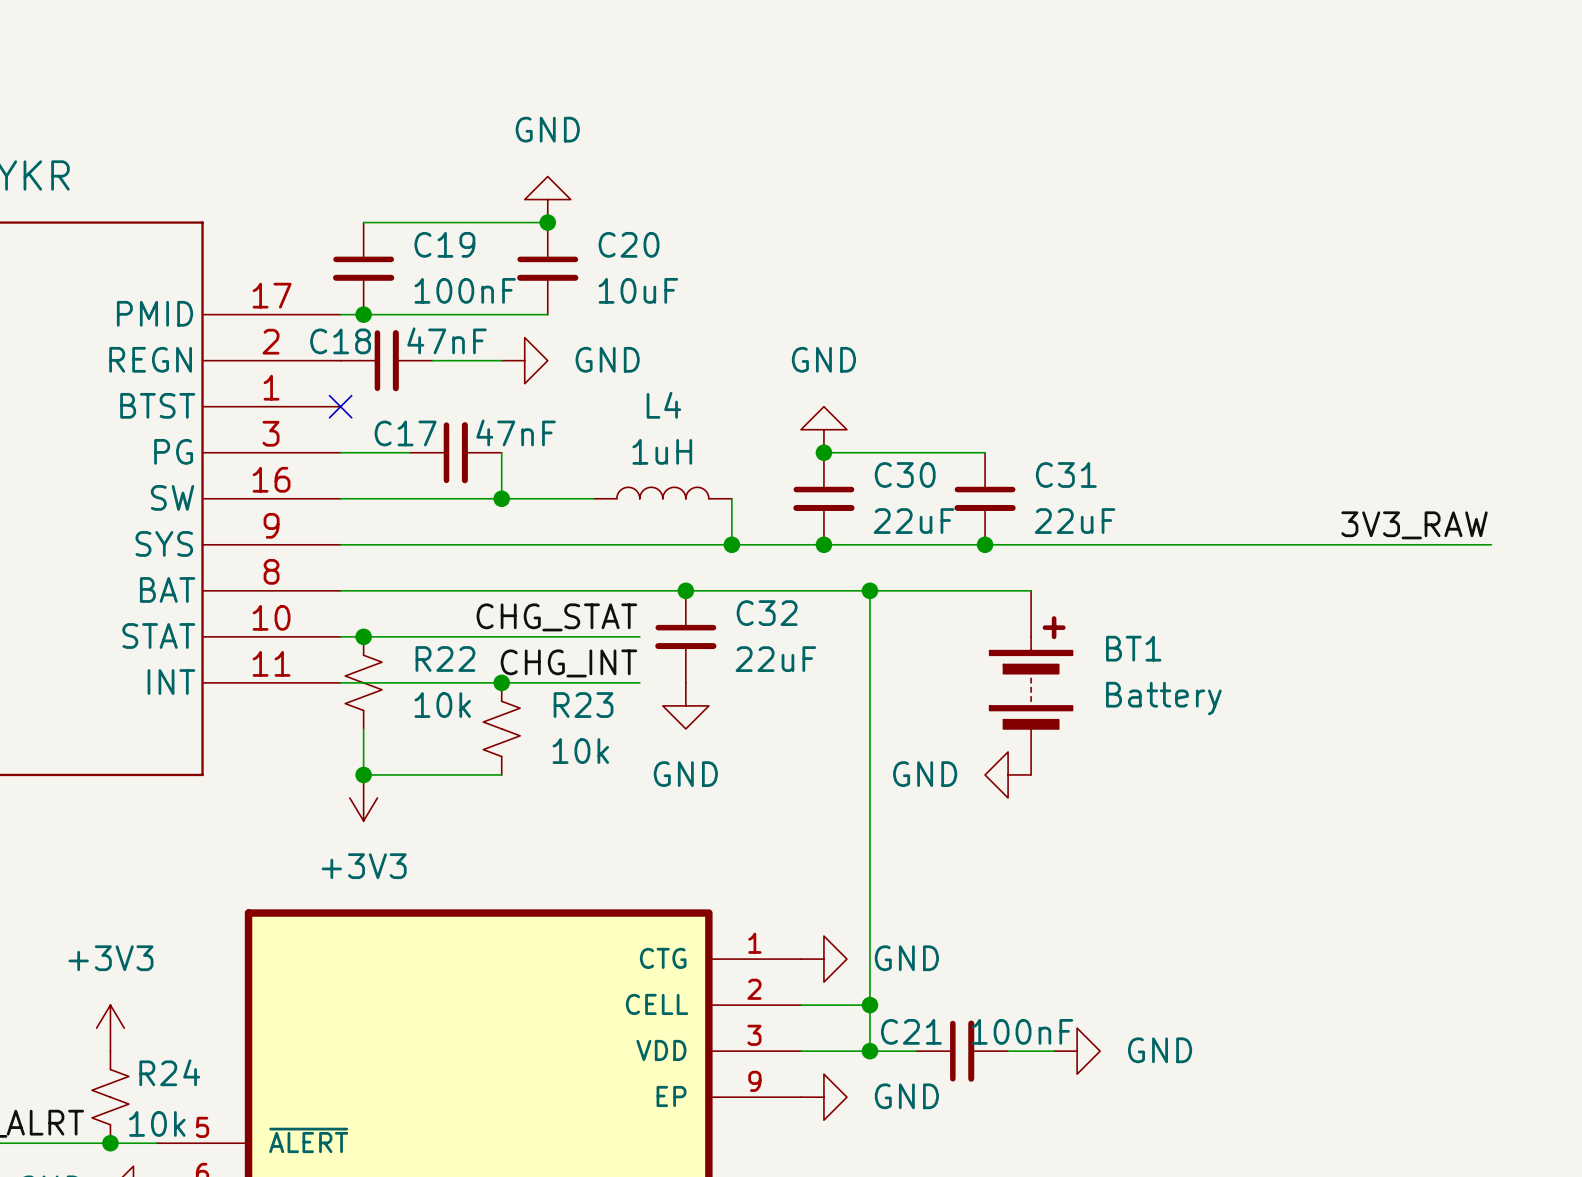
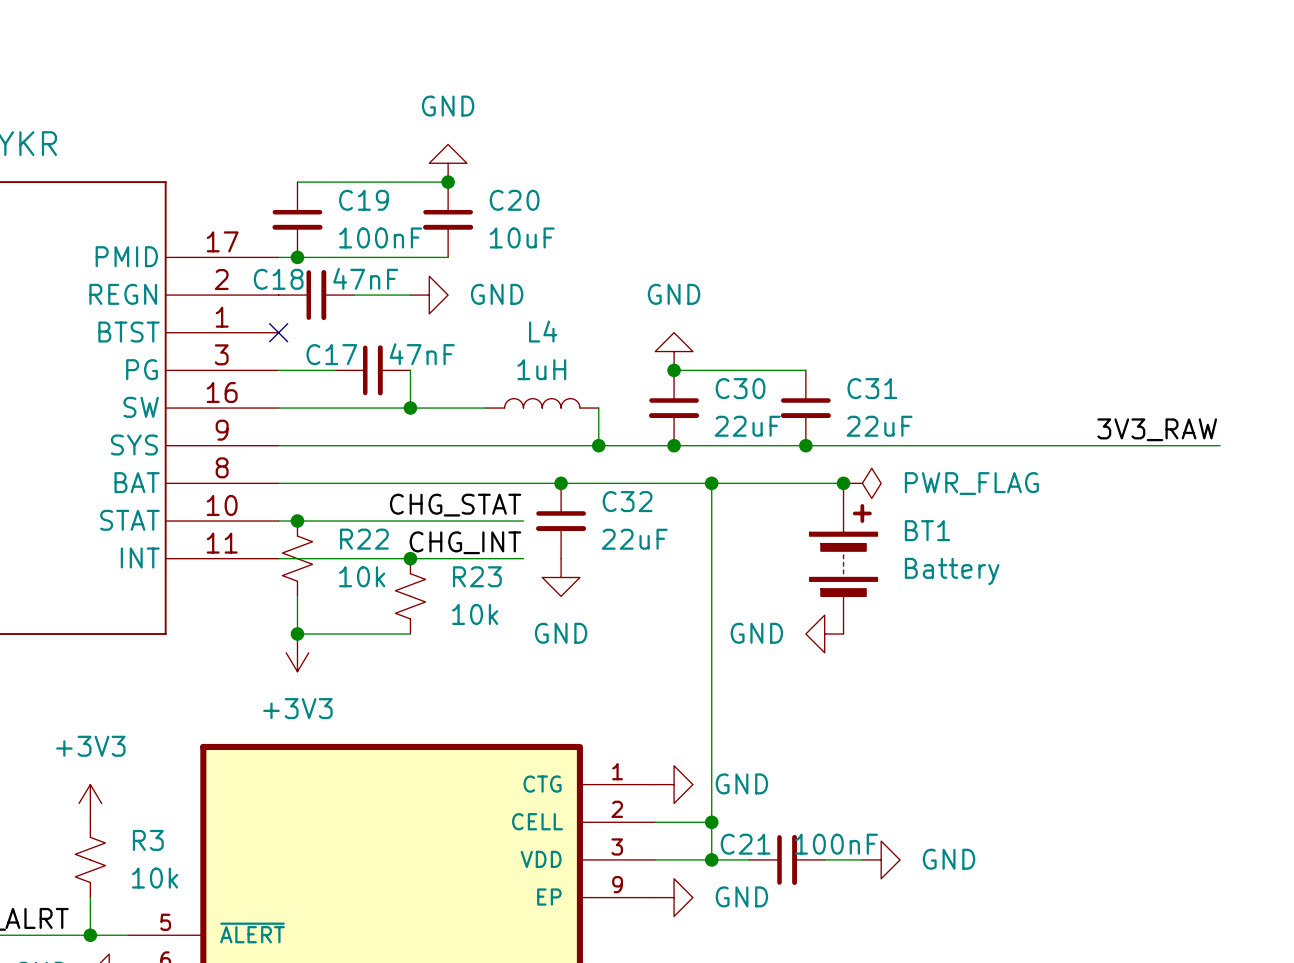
junction: none -> (843, 483)
power symbol: none -> PWR_FLAG (862, 483)
power symbol position: +3V3 (110, 1028) -> +3V3 (90, 803)
R3: none -> 10k (90, 859)
wire: none -> (90, 897) (90, 935)
R24: 10k (110, 1097) -> none

